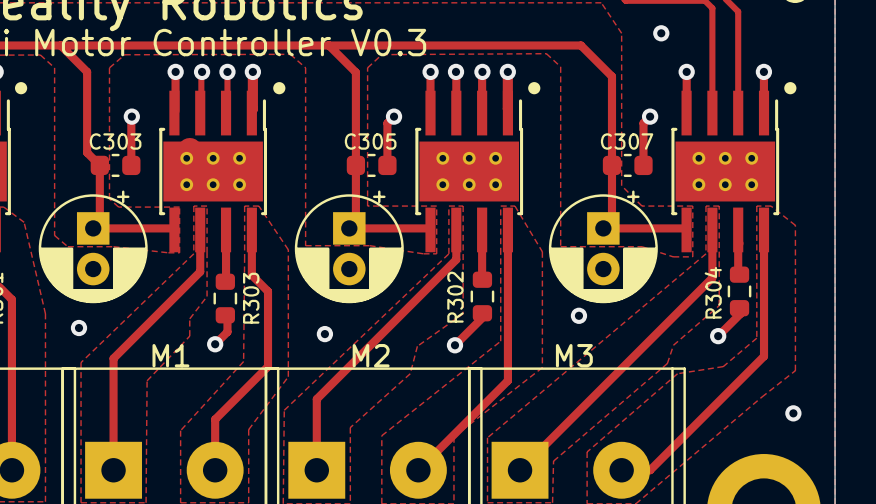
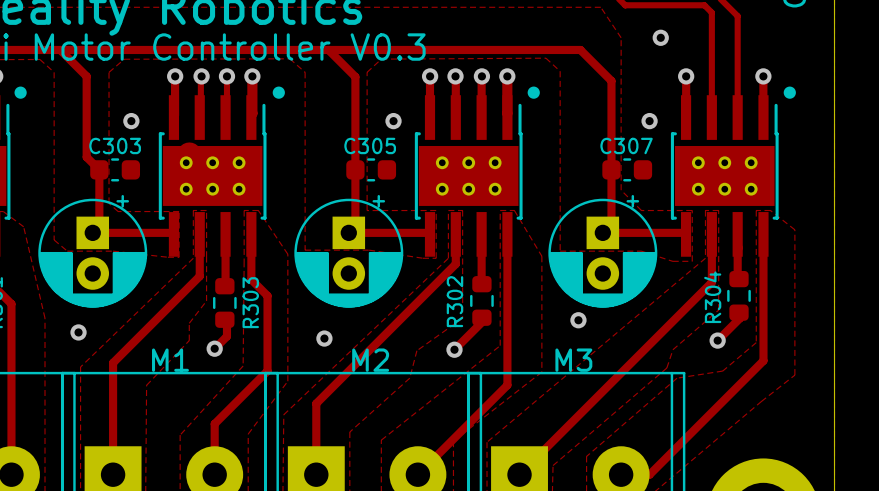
track: (131, 116) (131, 165) -> none
track: (394, 116) (387, 123) (387, 165) -> none
track: (650, 116) (643, 123) (643, 165) -> none
via: (793, 413) -> none

